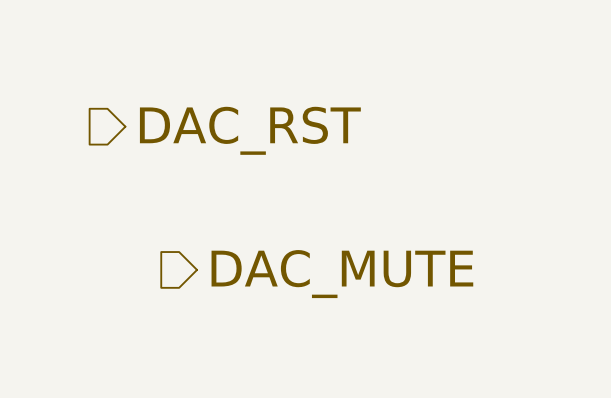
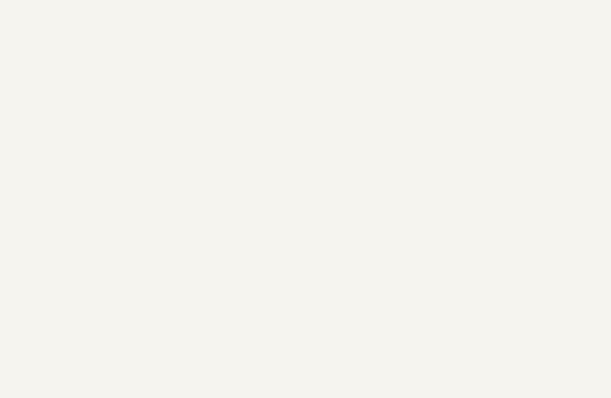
hierarchical label: DAC_RST (250, 130) -> none
hierarchical label: DAC_MUTE (342, 274) -> none

